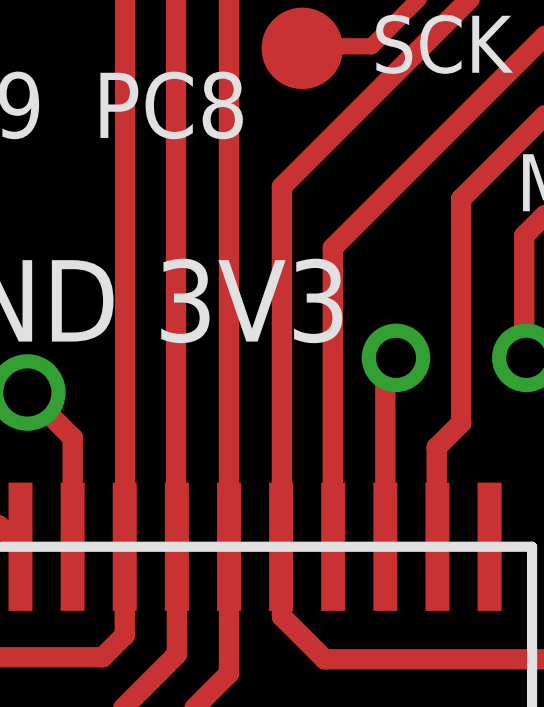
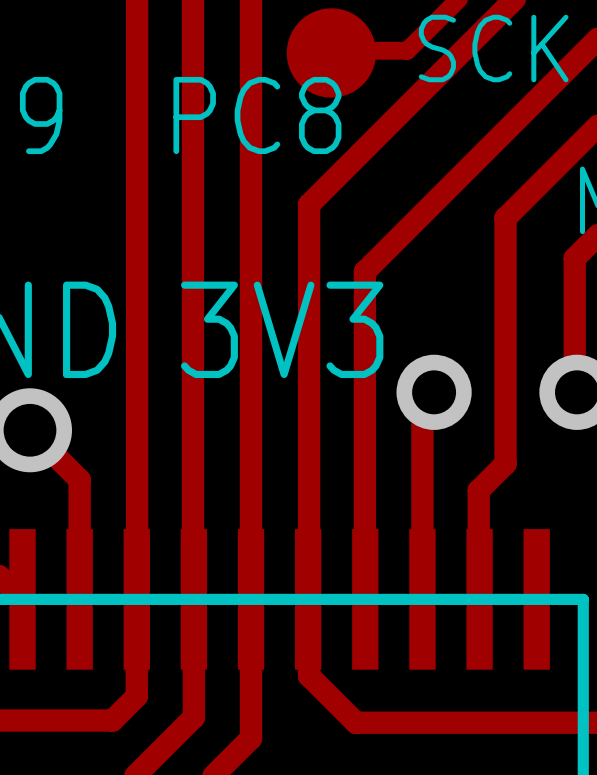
text position: PC8 (171, 105) -> PC8 (257, 115)

